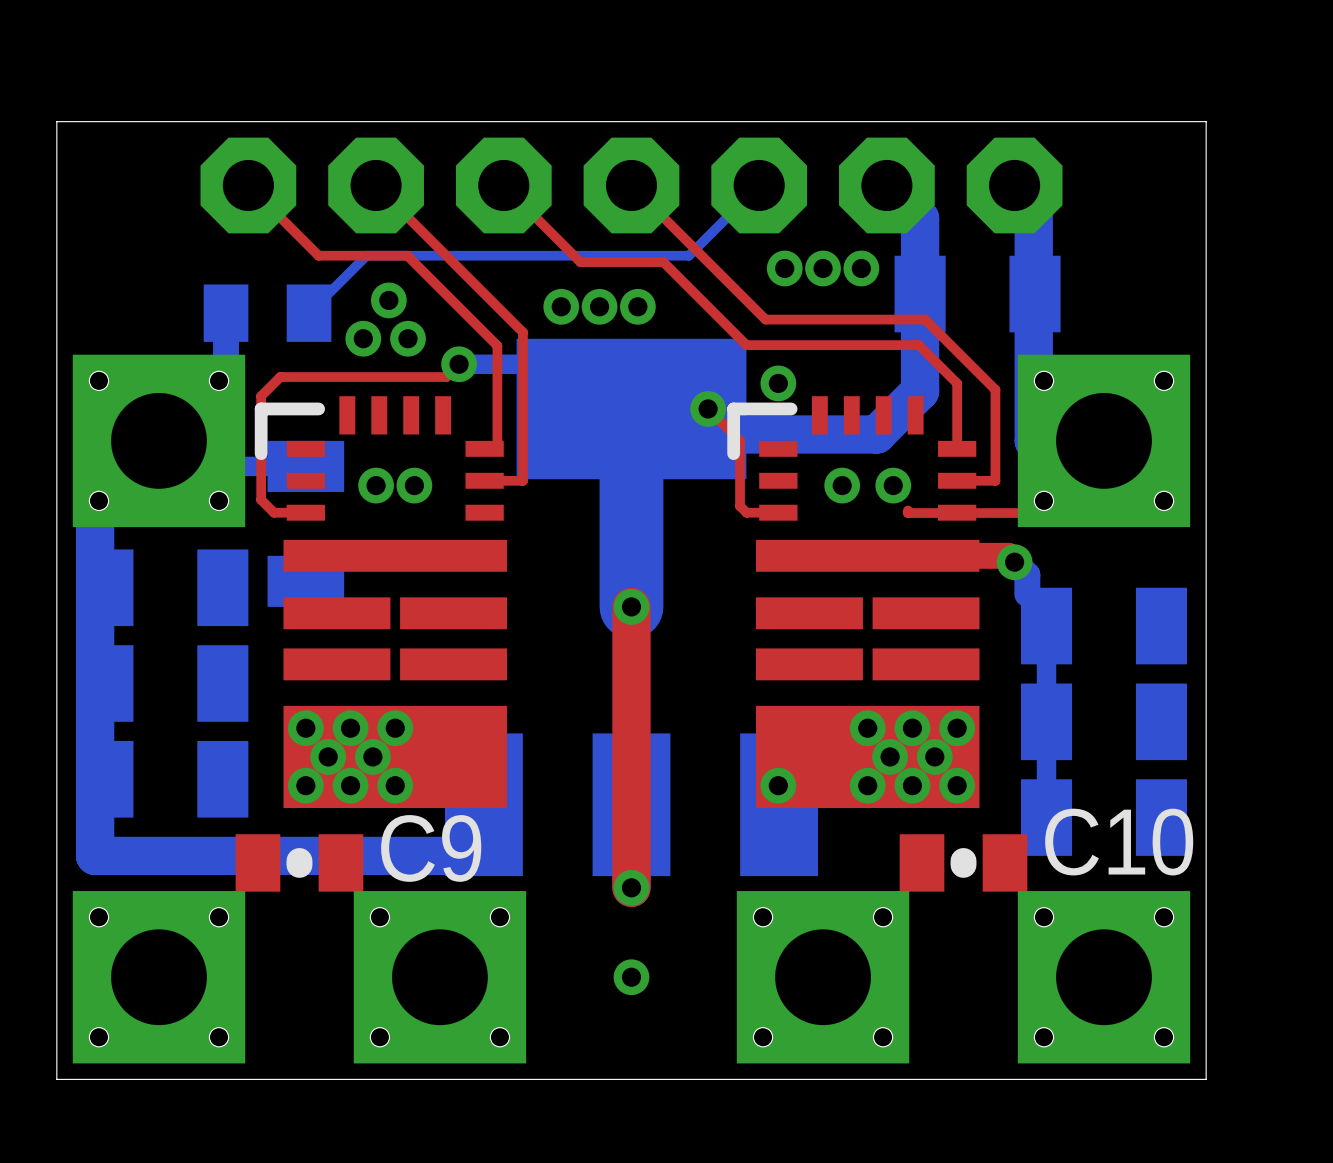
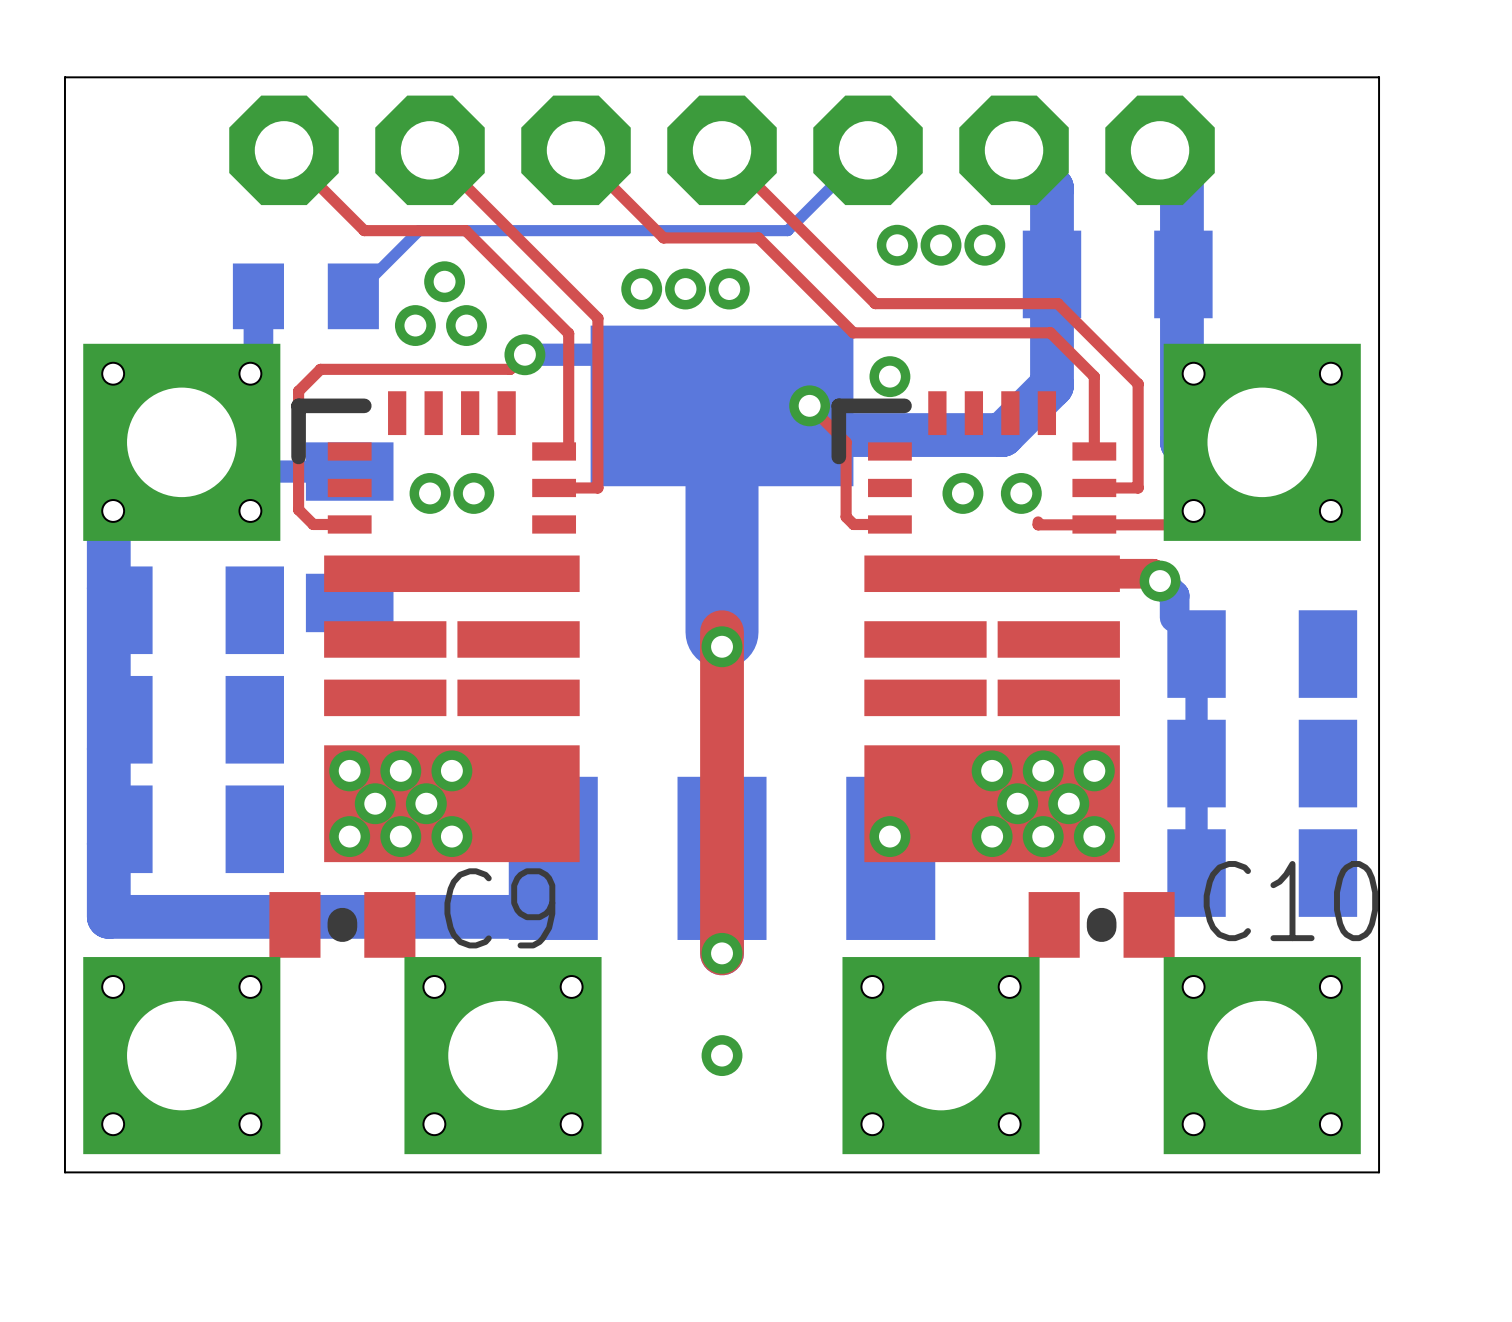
via position: (631, 606) -> (722, 646)

